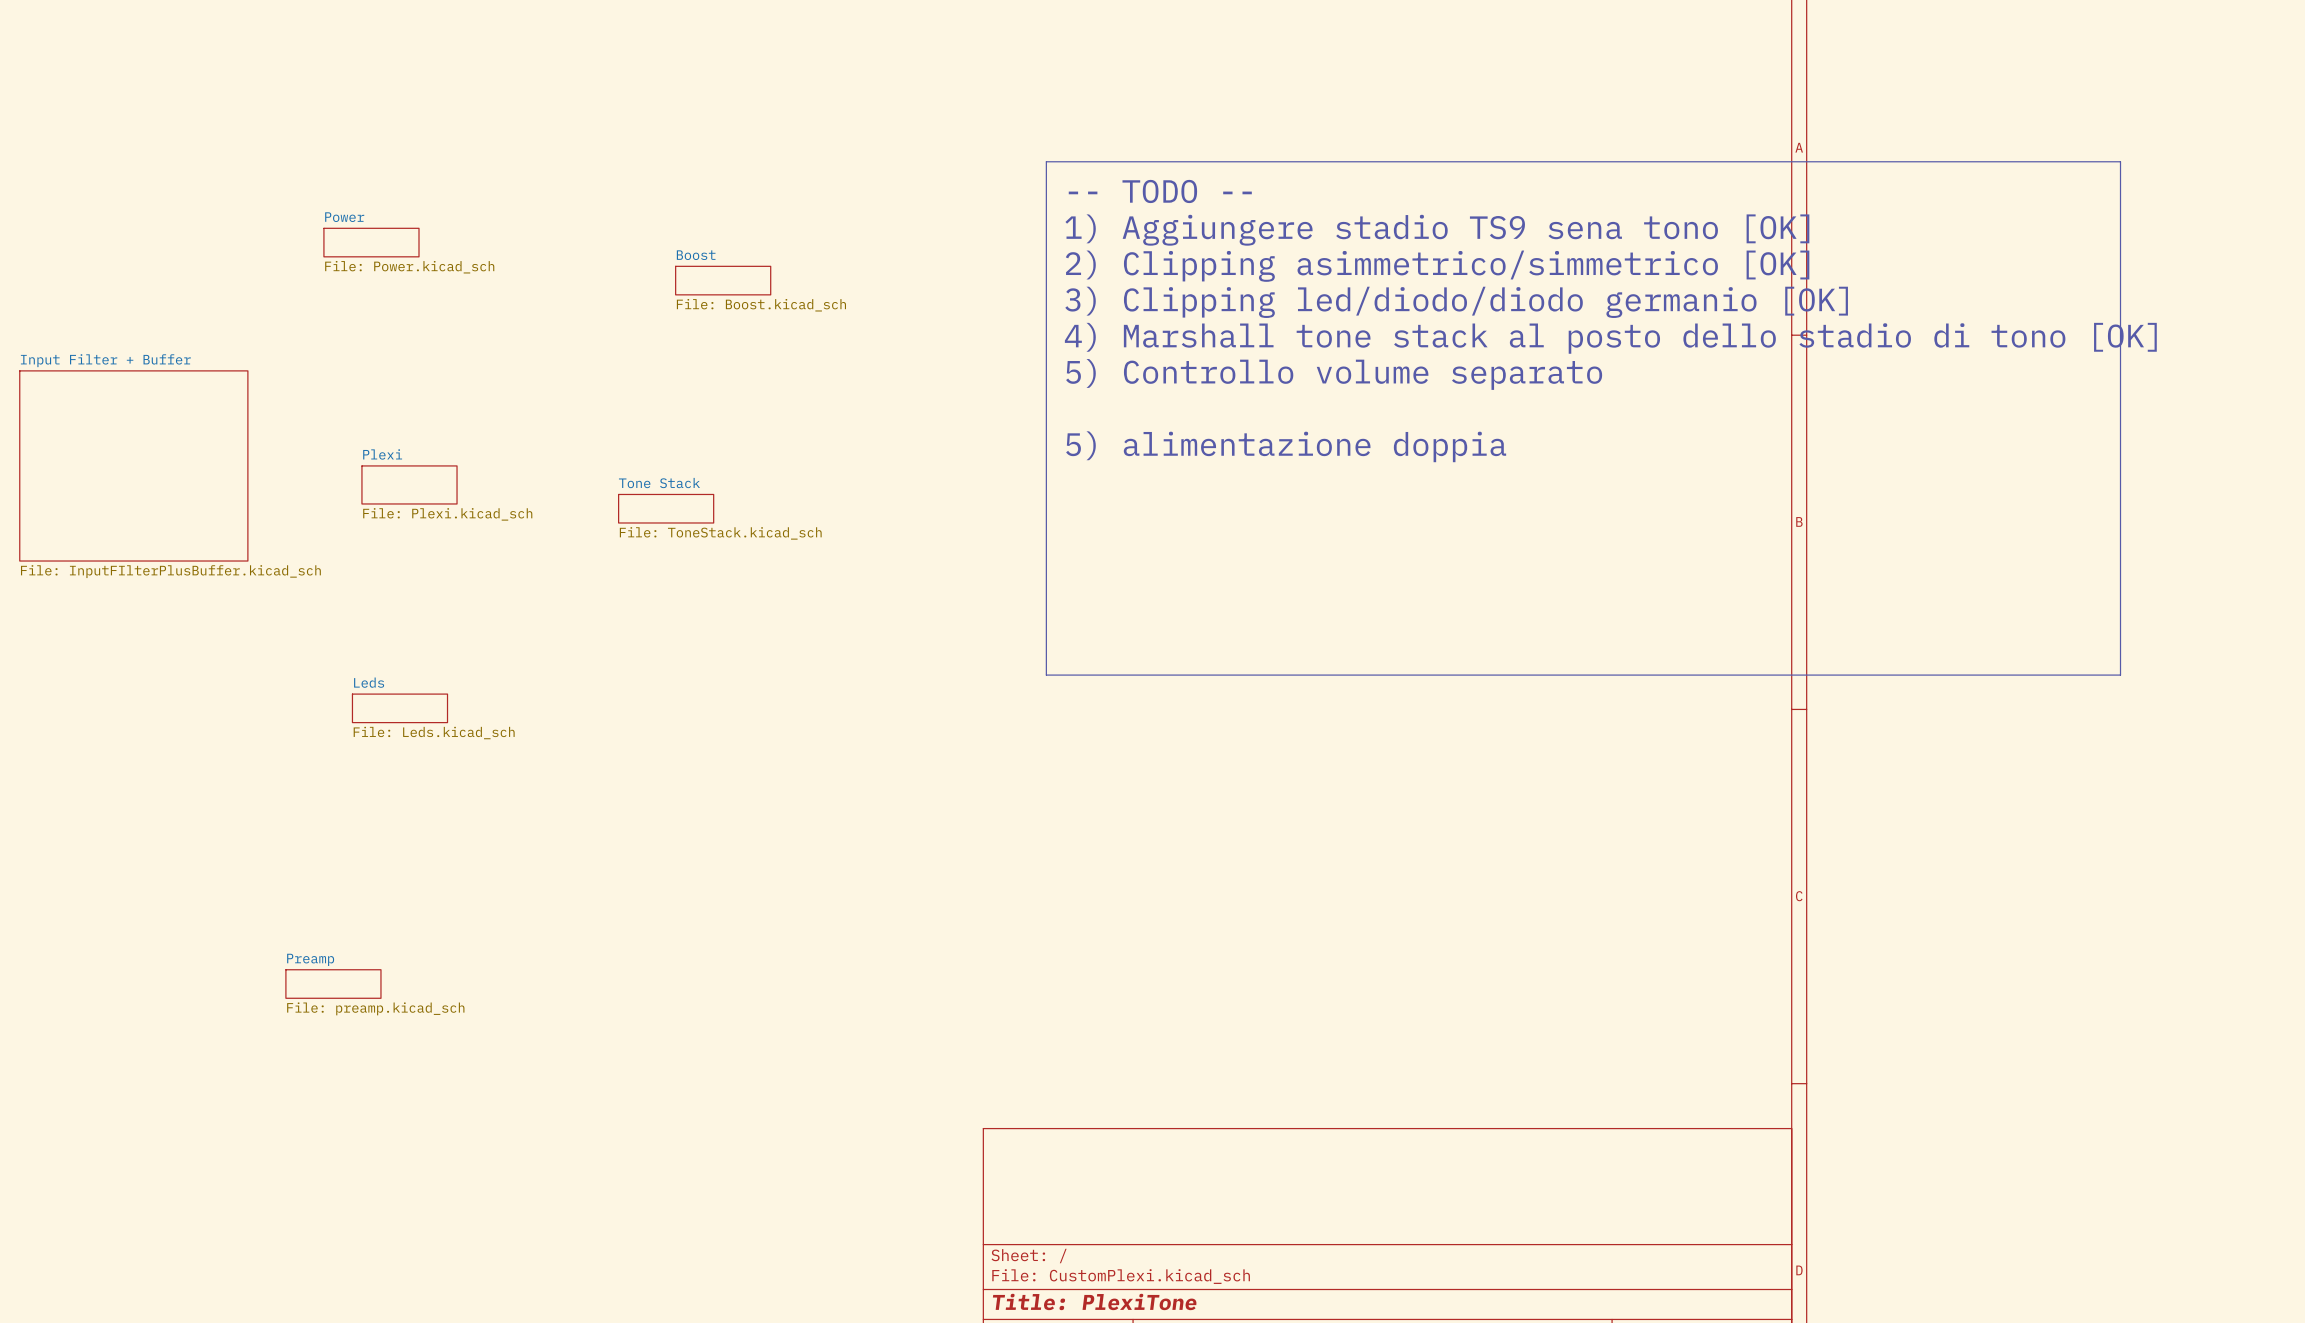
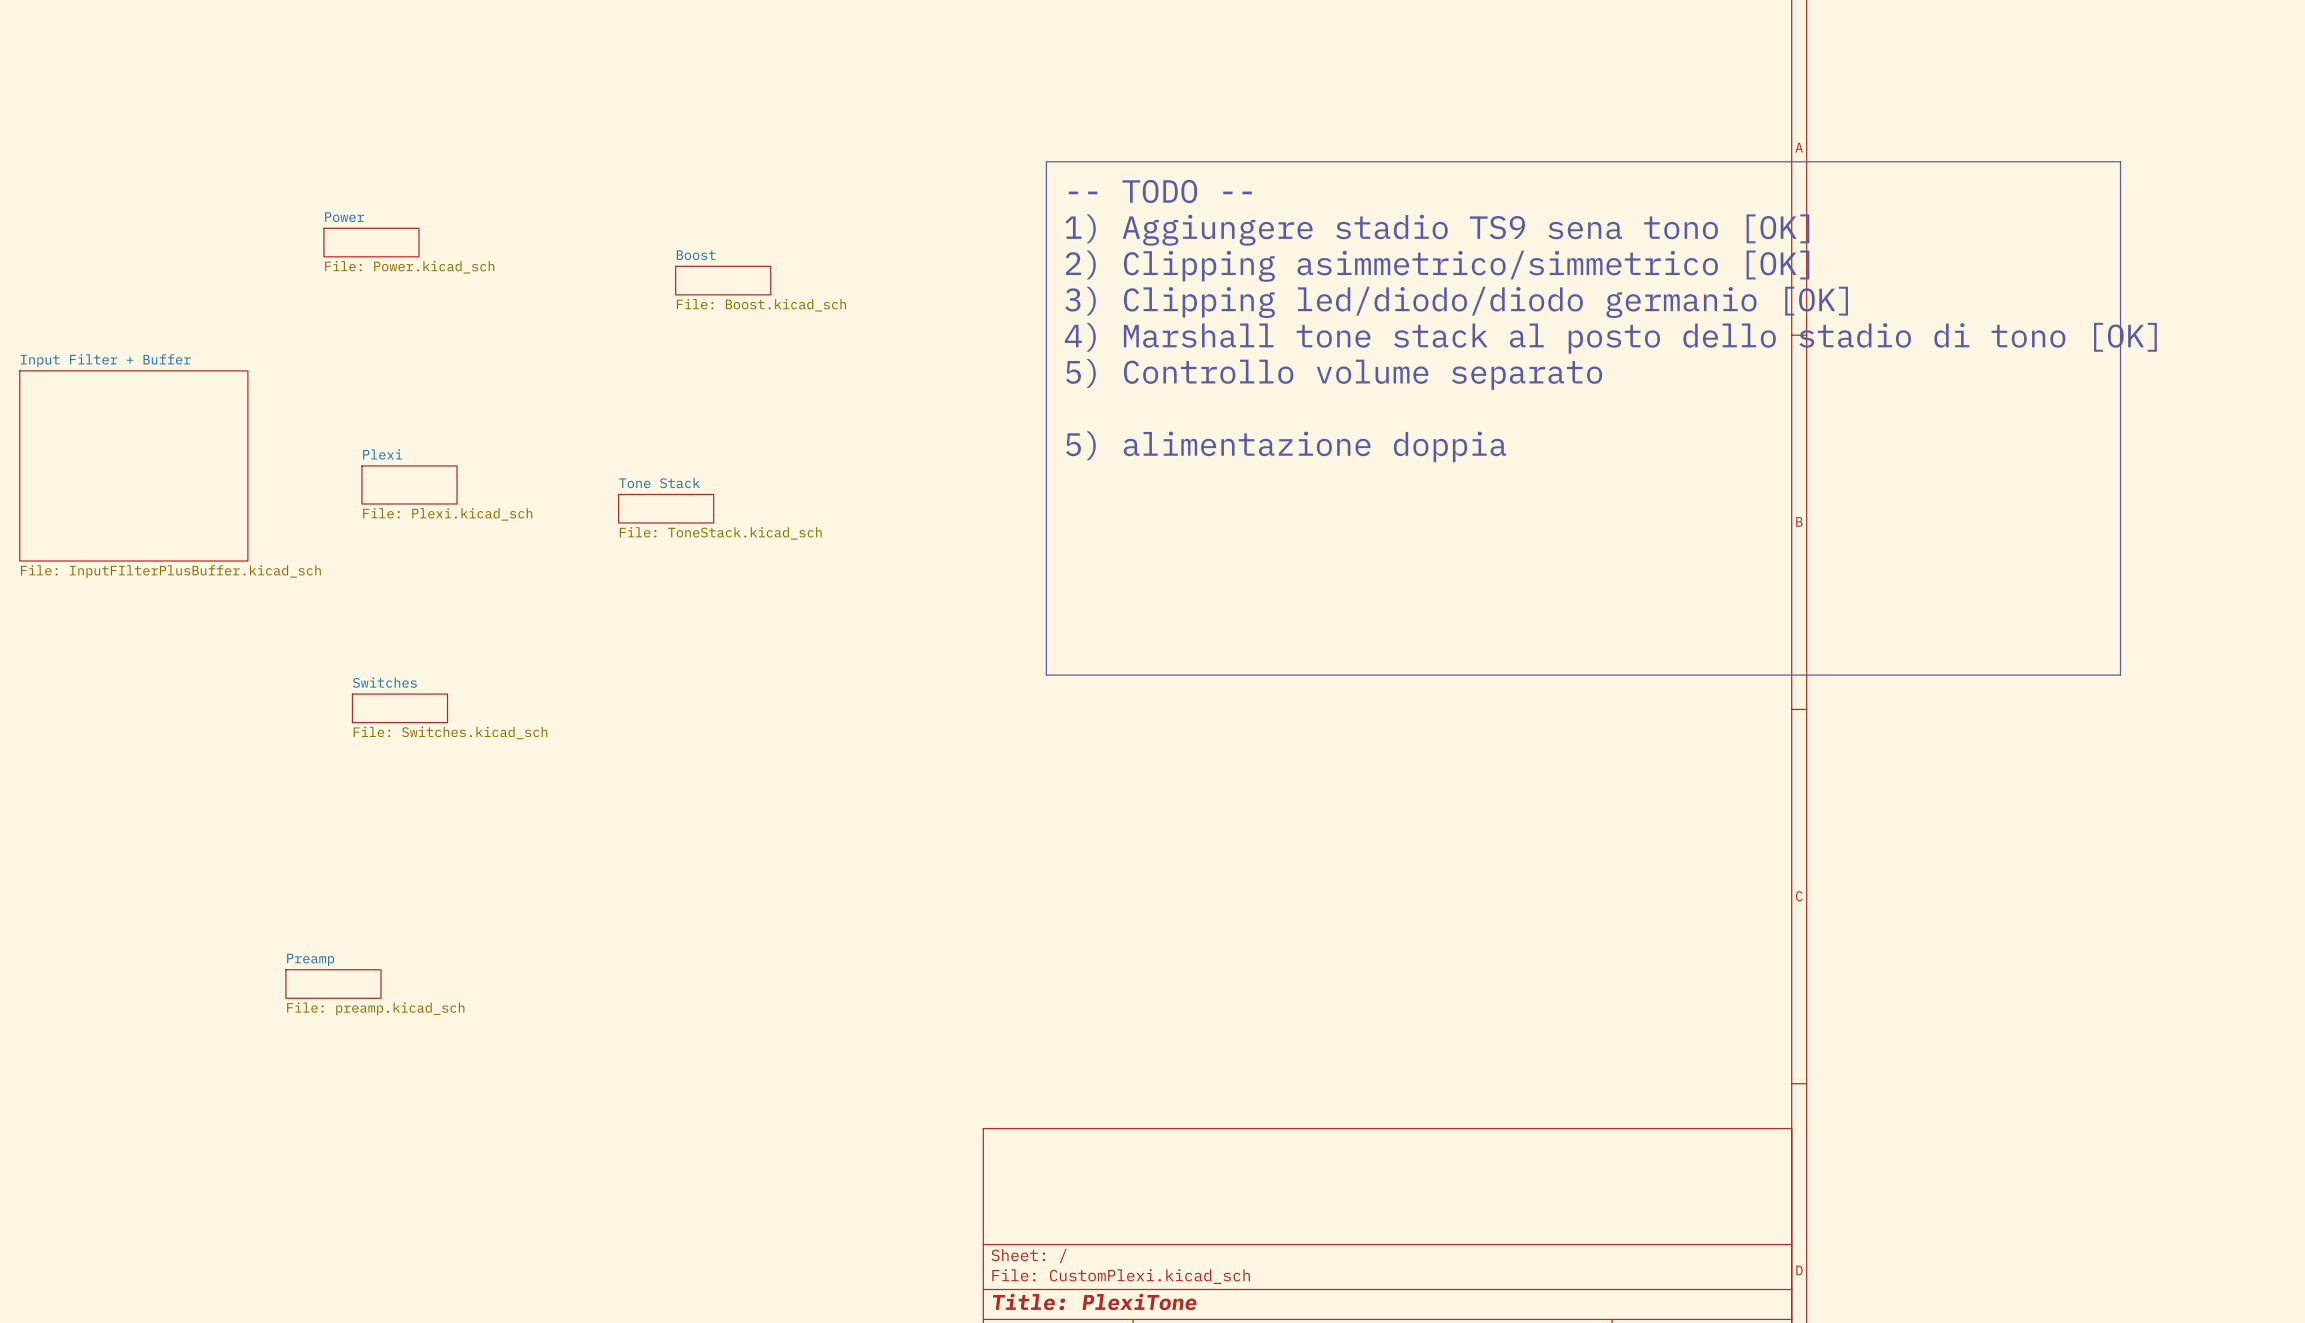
sheet Leds name: Leds (369, 682) -> Switches (384, 682)
sheet Leds value: File: Leds.kicad_sch (434, 733) -> File: Switches.kicad_sch (450, 733)

